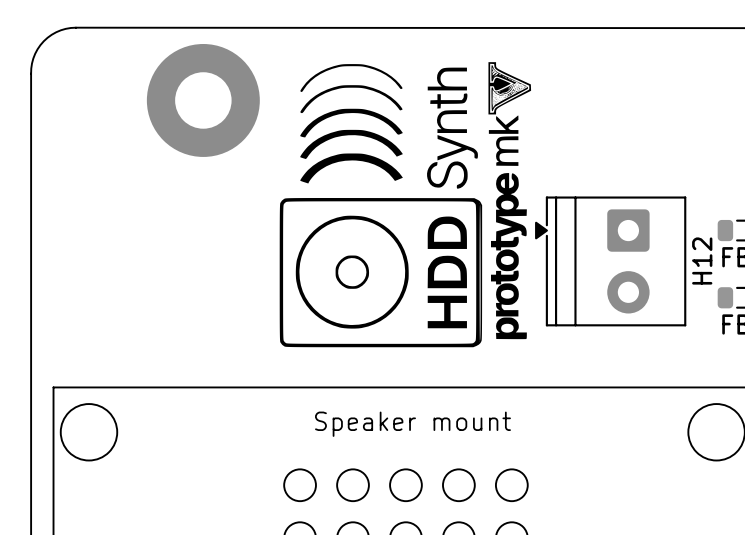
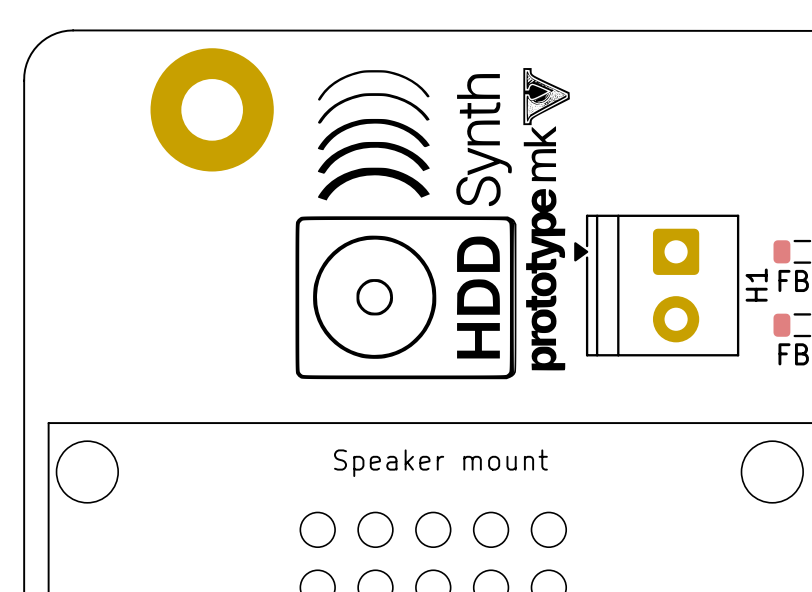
H12 name: H12 (702, 261) -> H1 (756, 285)

